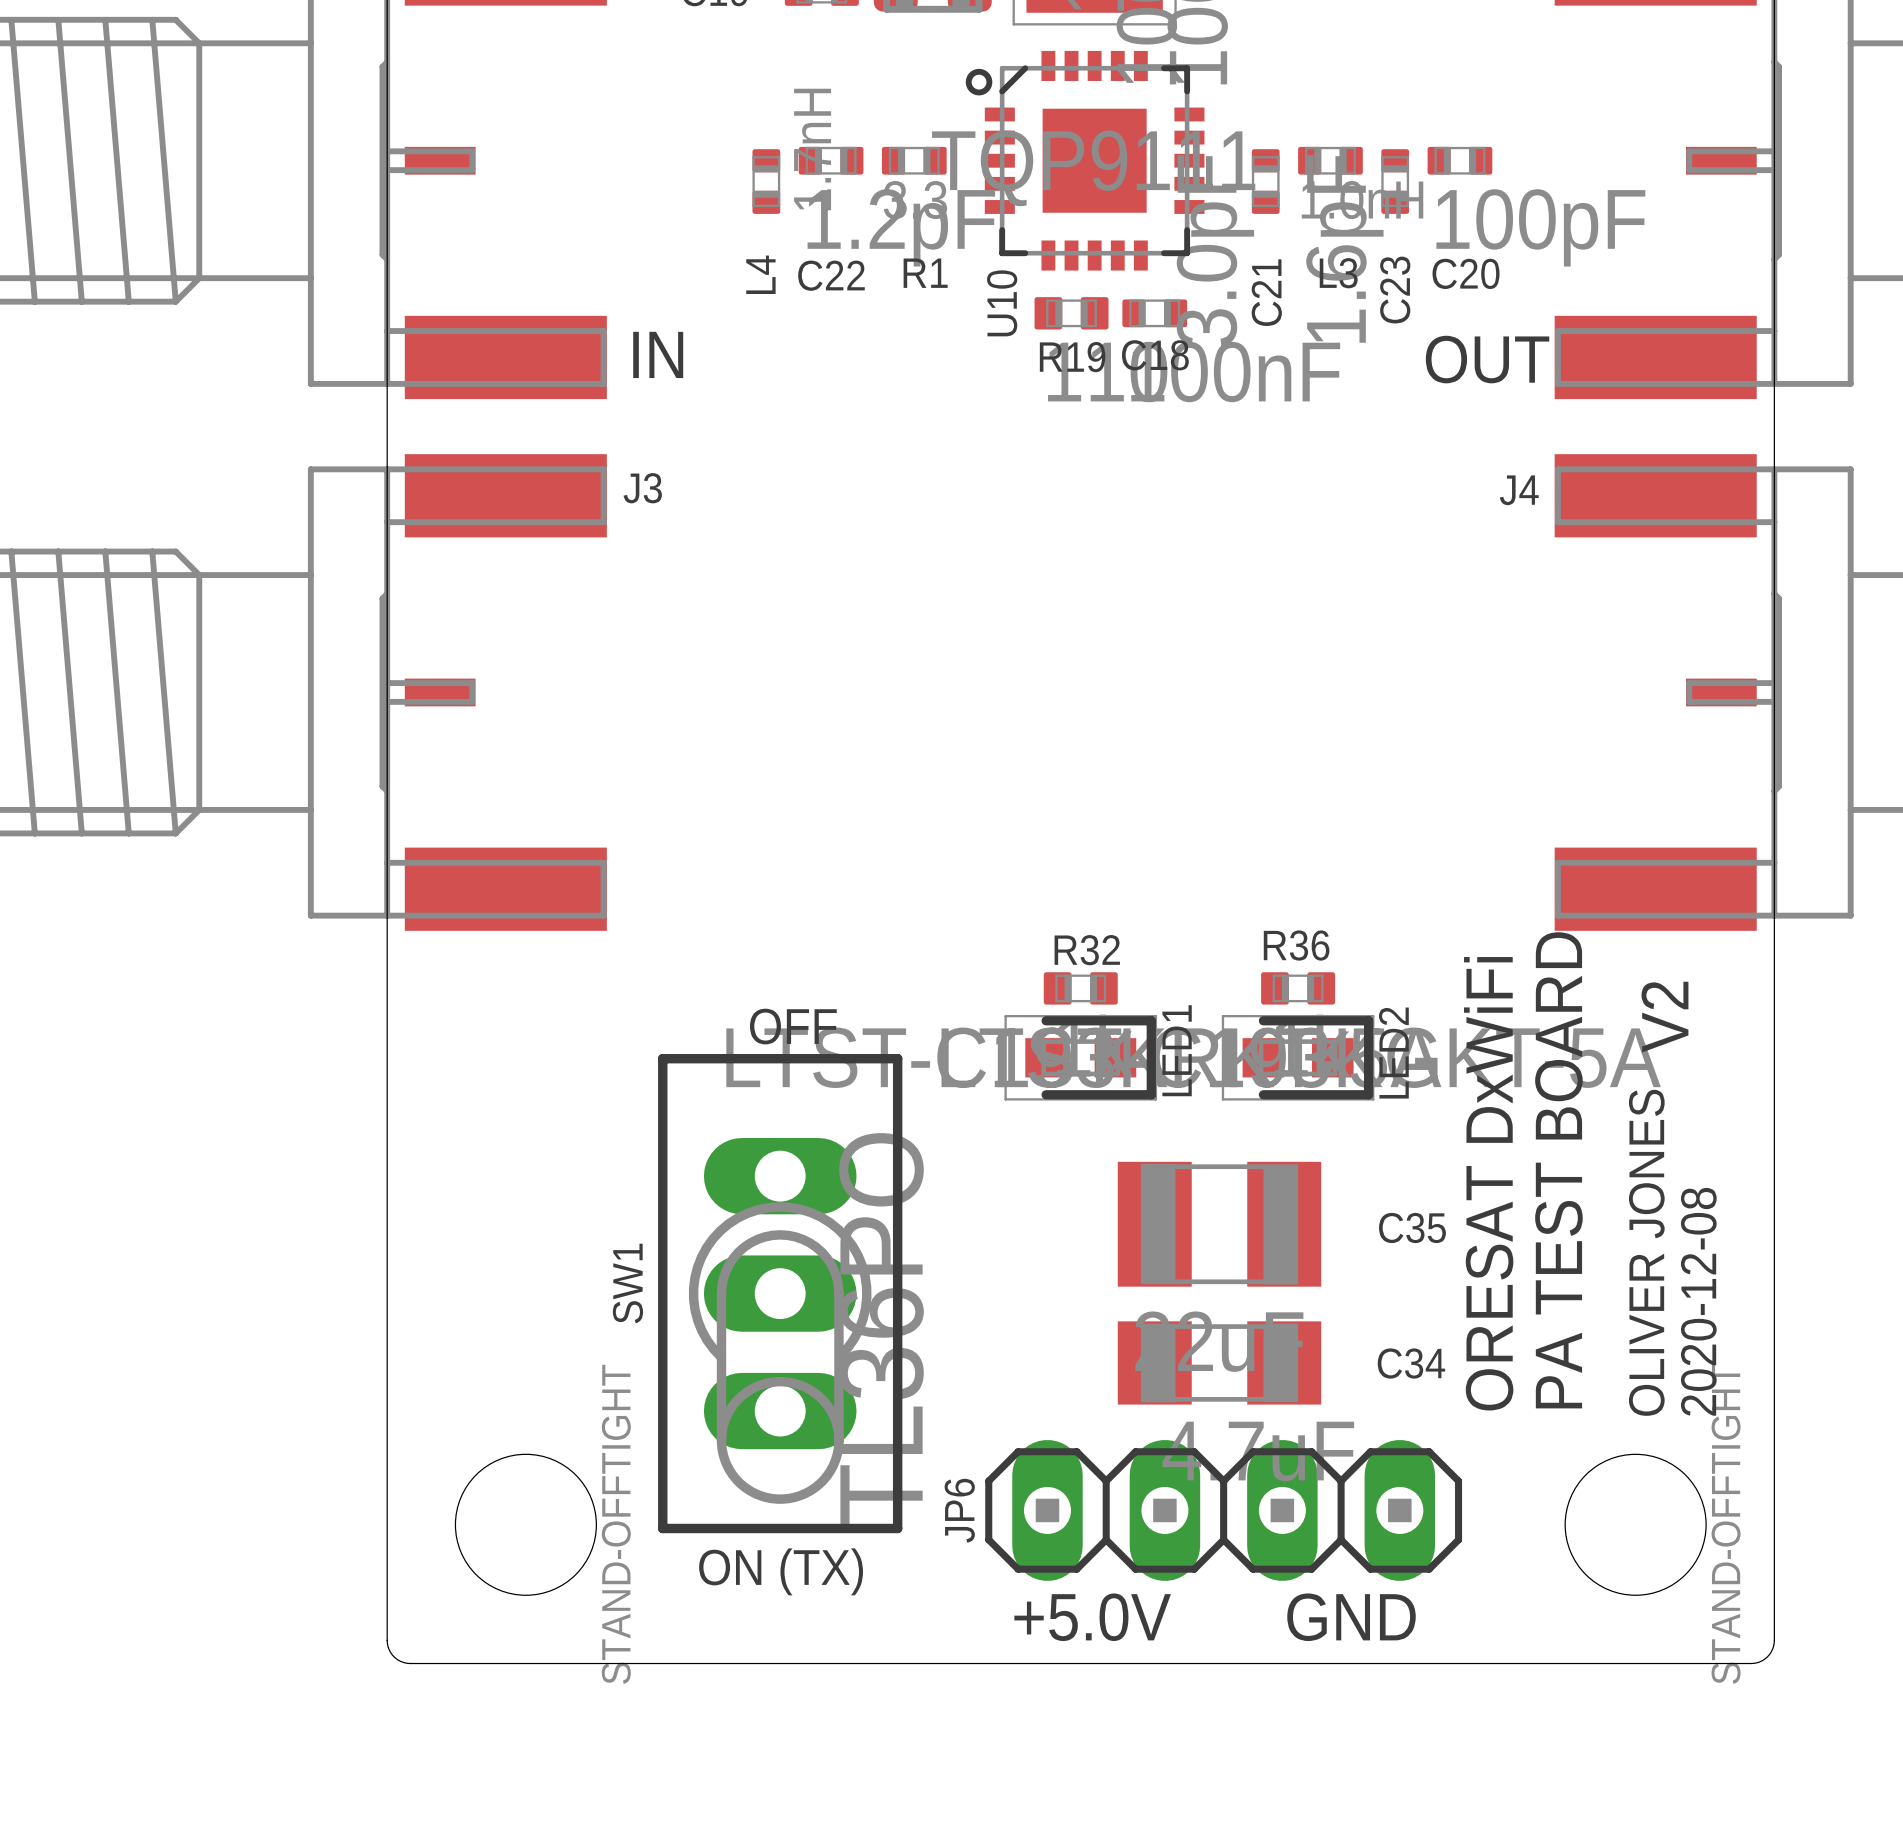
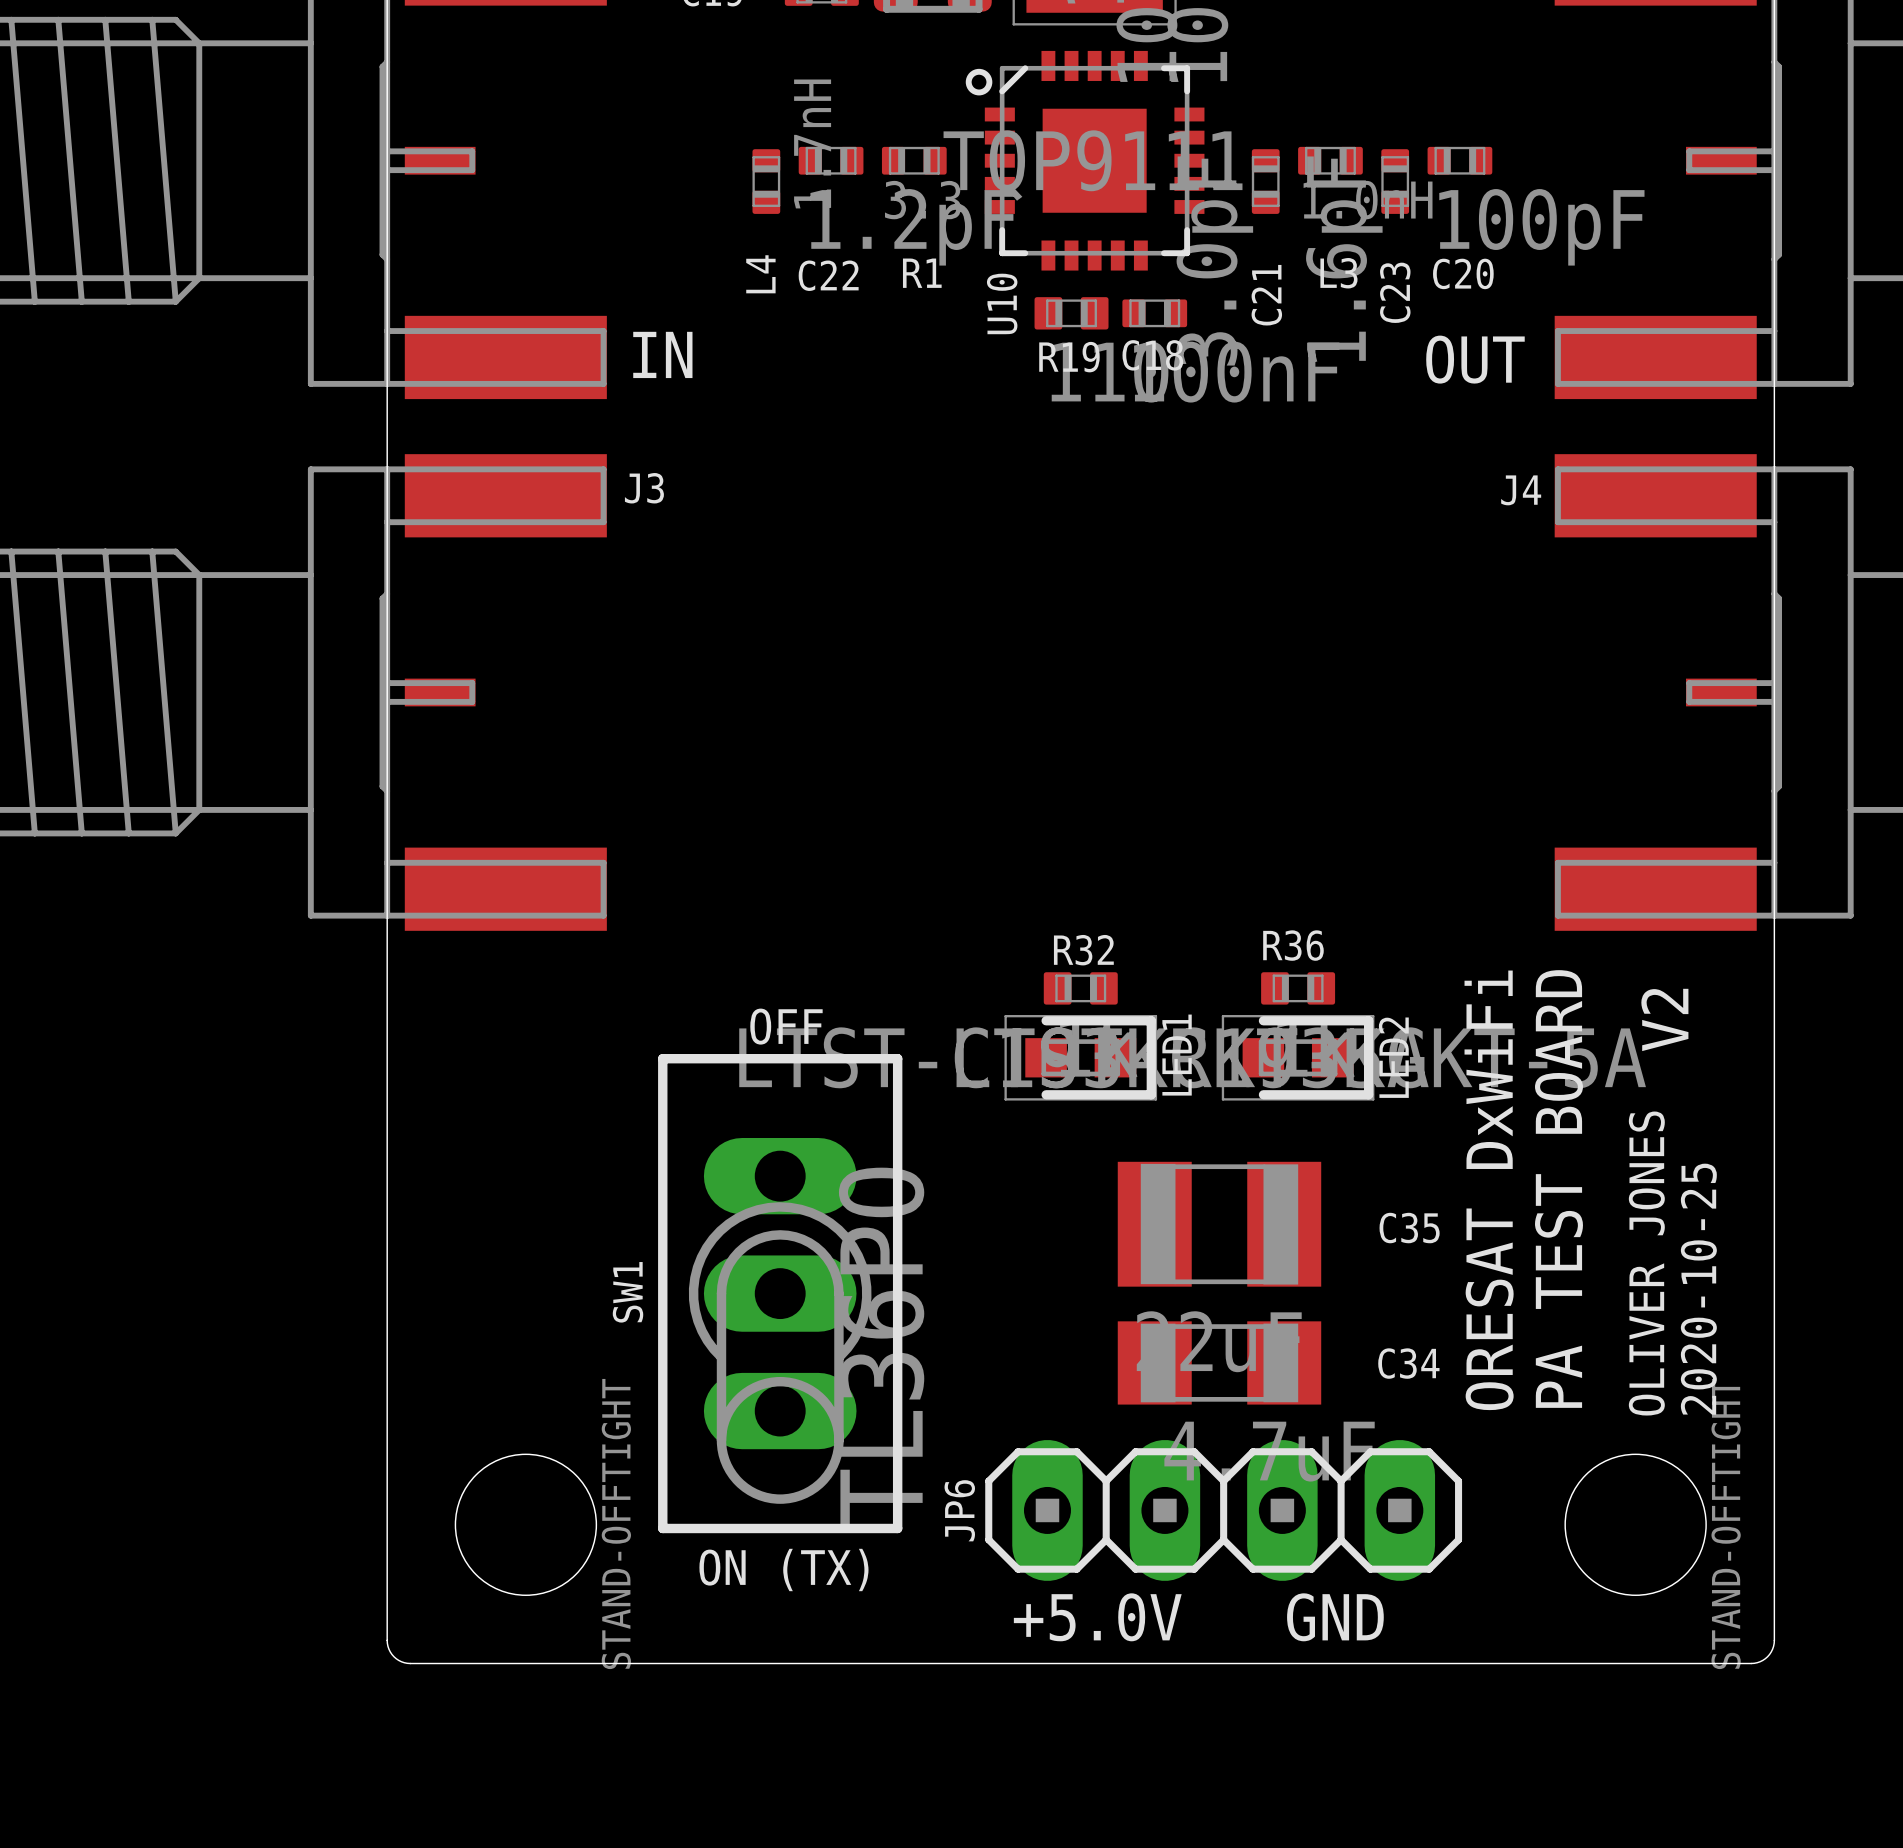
text: 2020-12-08 (1698, 1301) -> 2020-10-25 (1698, 1289)

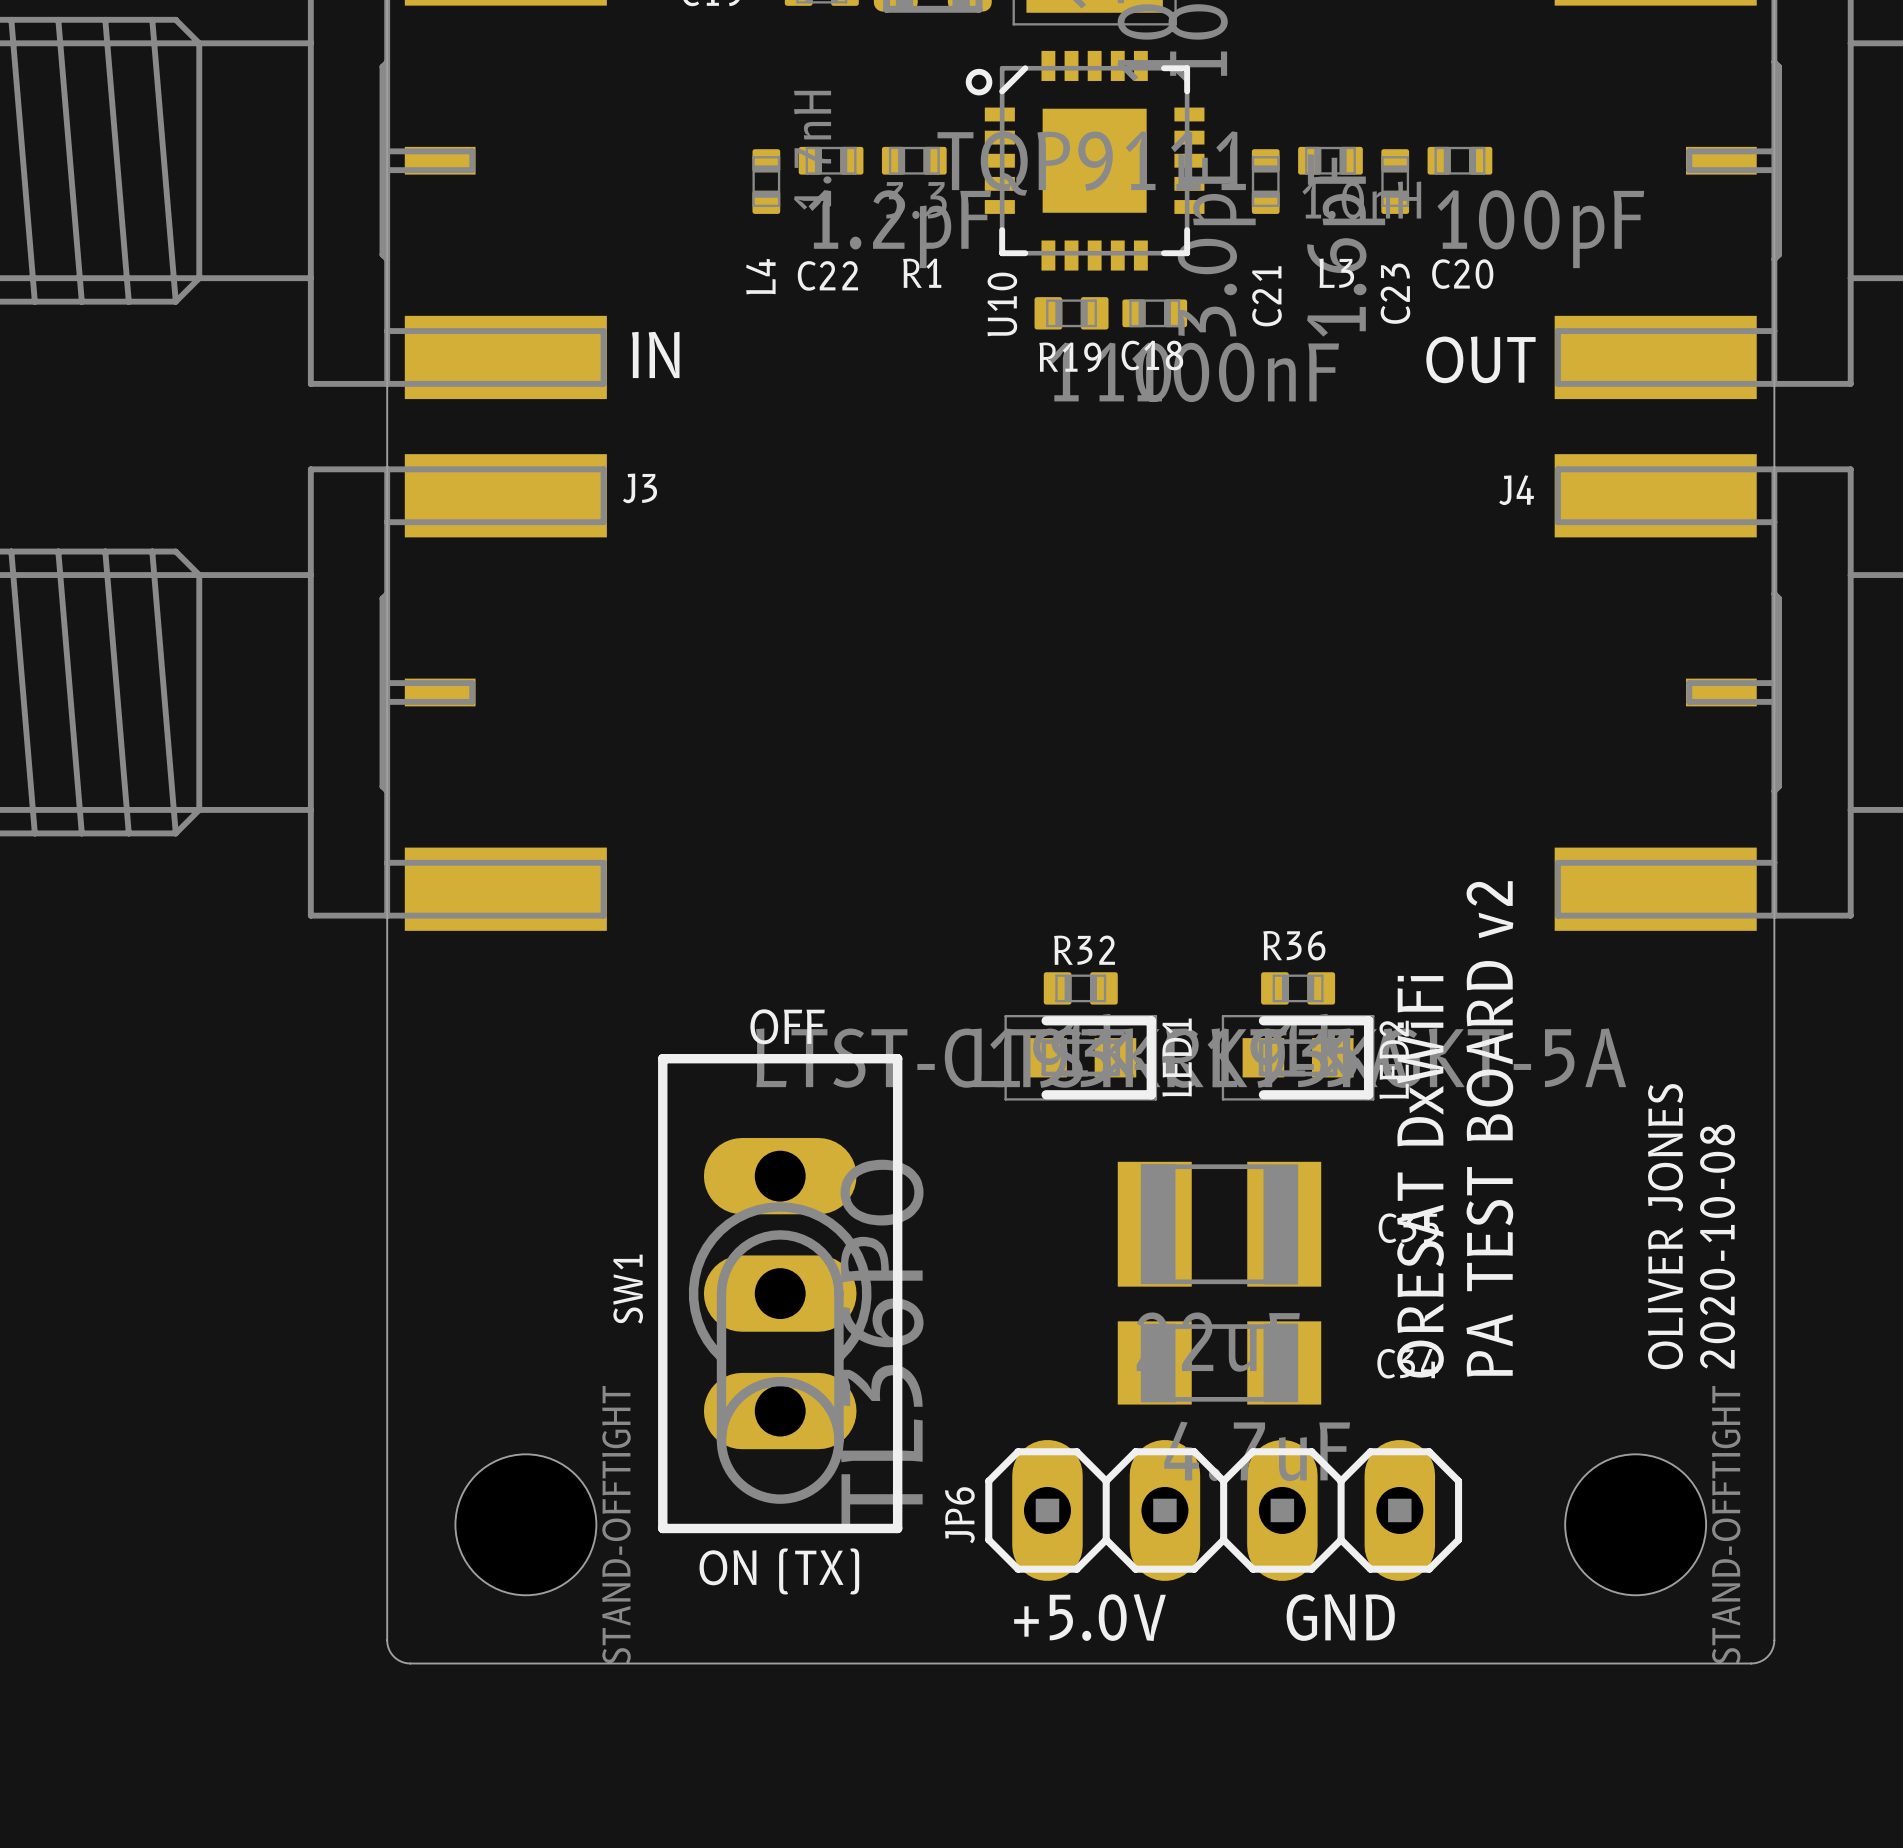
text: V2 (1664, 1019) -> none
text: PA TEST BOARD (1558, 1189) -> PA TEST BOARD v2 (1489, 1128)
text position: ORESAT DxWiFi (1489, 1190) -> ORESAT DxWiFi (1420, 1176)
text position: OLIVER JONES (1646, 1263) -> OLIVER JONES (1665, 1226)
text: 2020-10-25 (1698, 1289) -> 2020-10-08 (1717, 1246)

